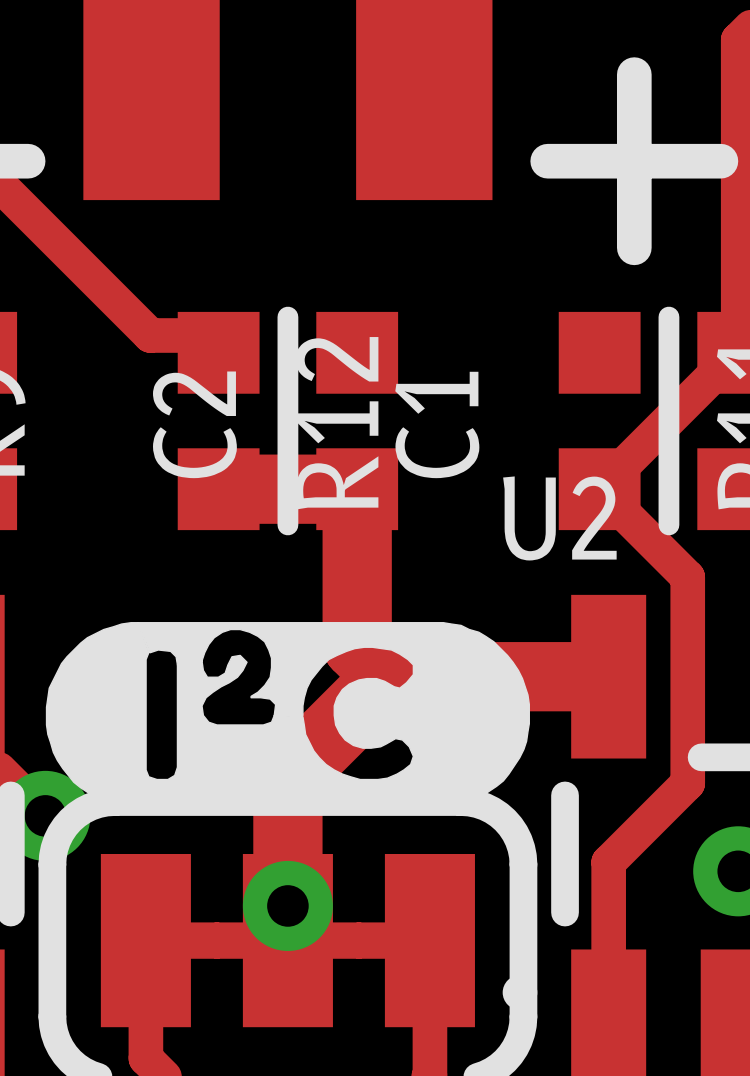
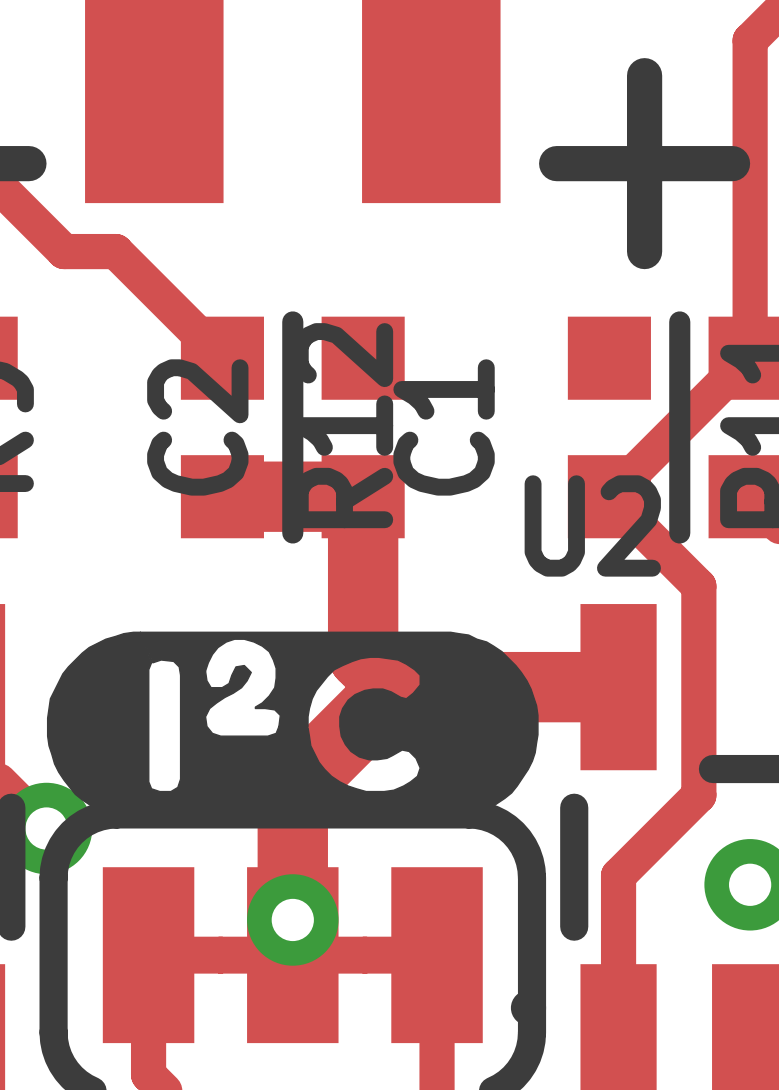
track: (62, 247) (150, 335) (201, 335) -> (64, 251) (115, 251) (204, 340)

